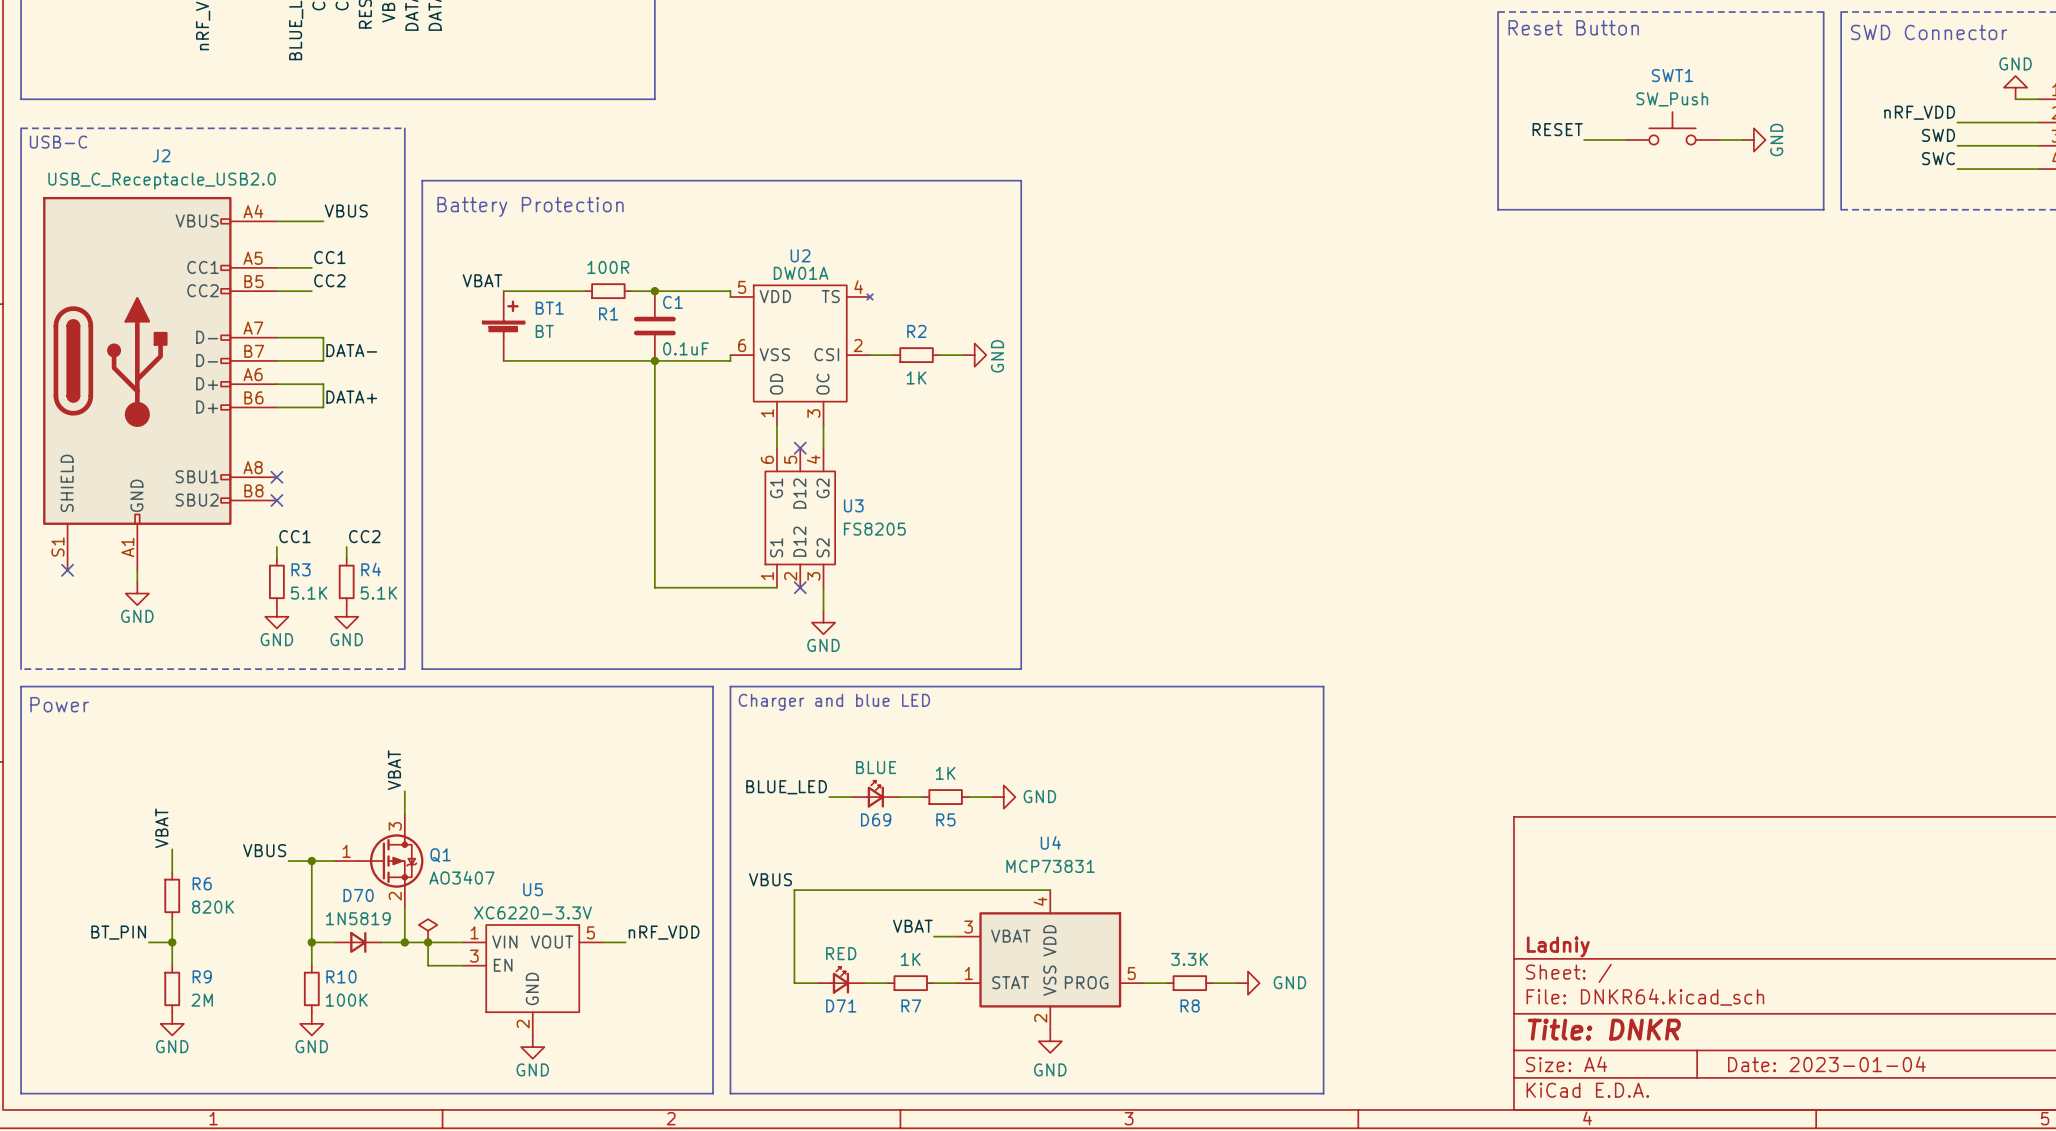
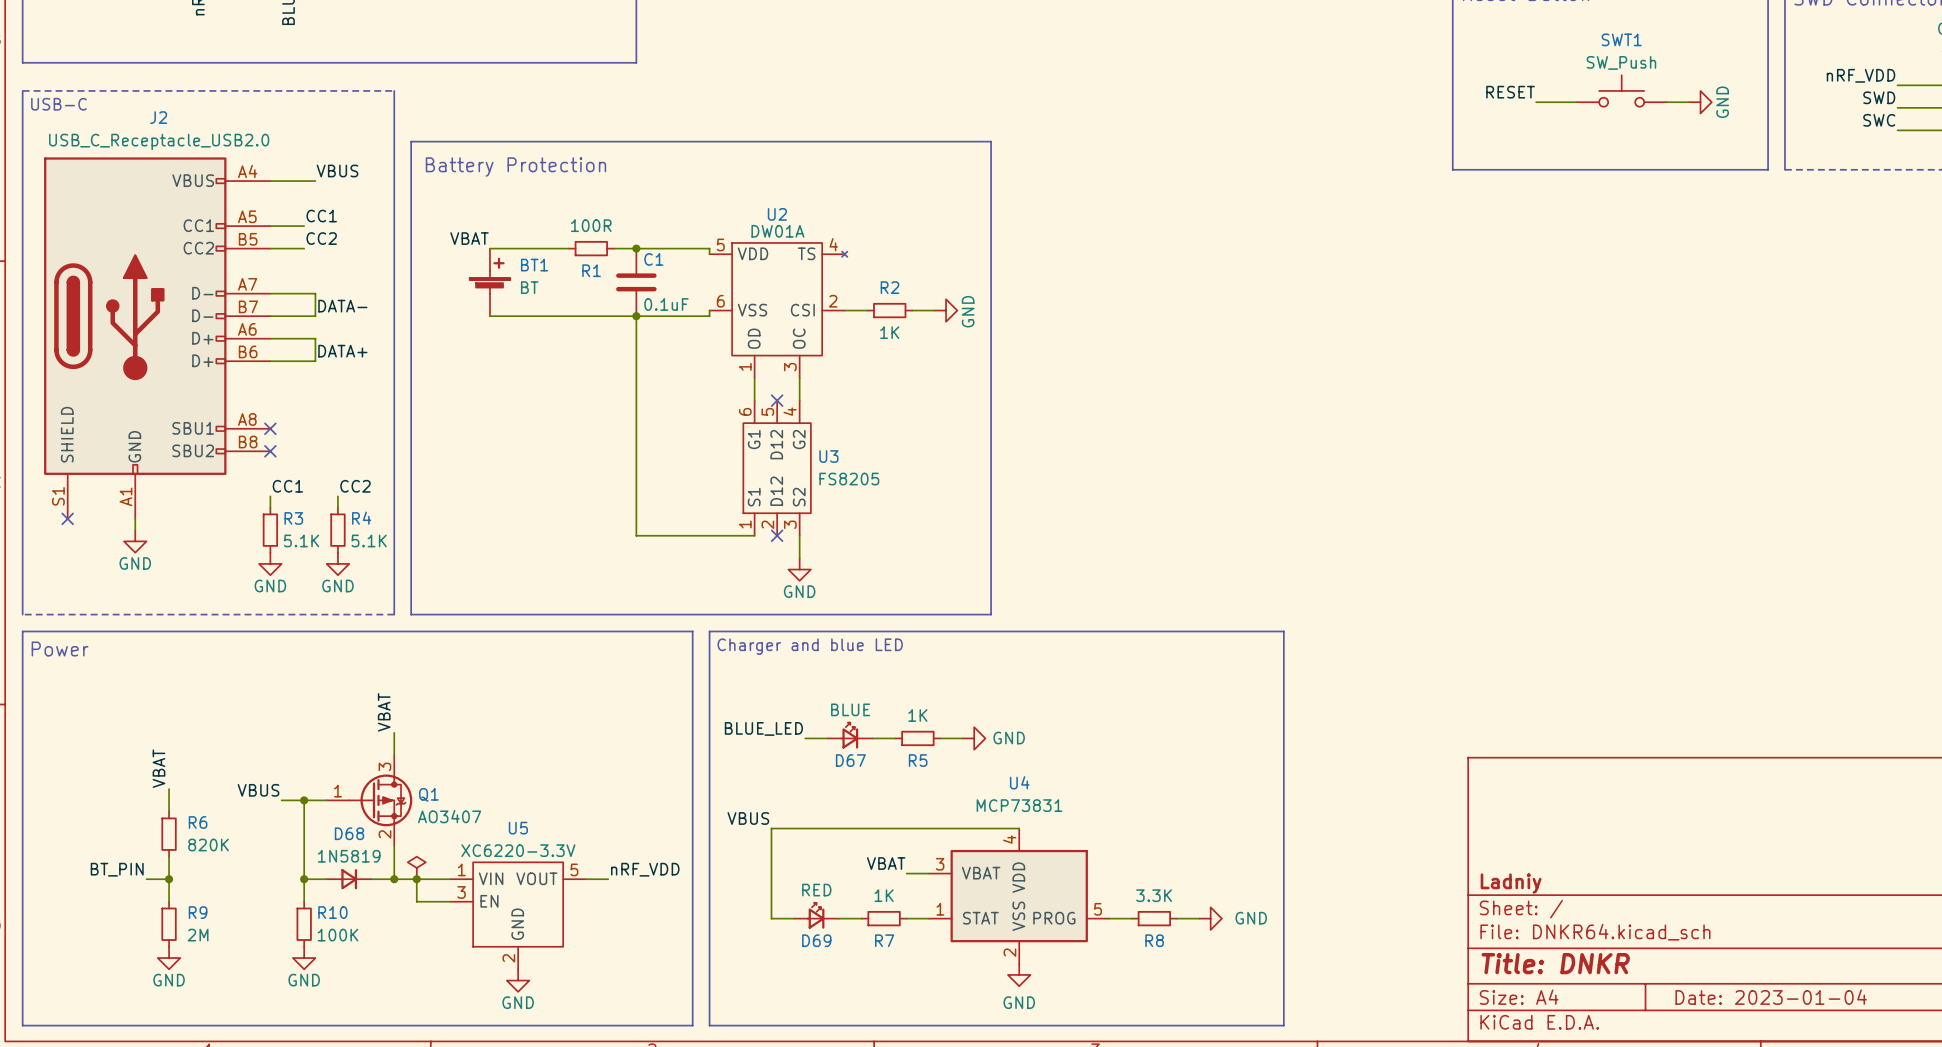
D69 name: D69 (876, 819) -> D67 (850, 760)
D70 name: D70 (358, 895) -> D68 (349, 833)
D71 name: D71 (841, 1005) -> D69 (816, 940)

